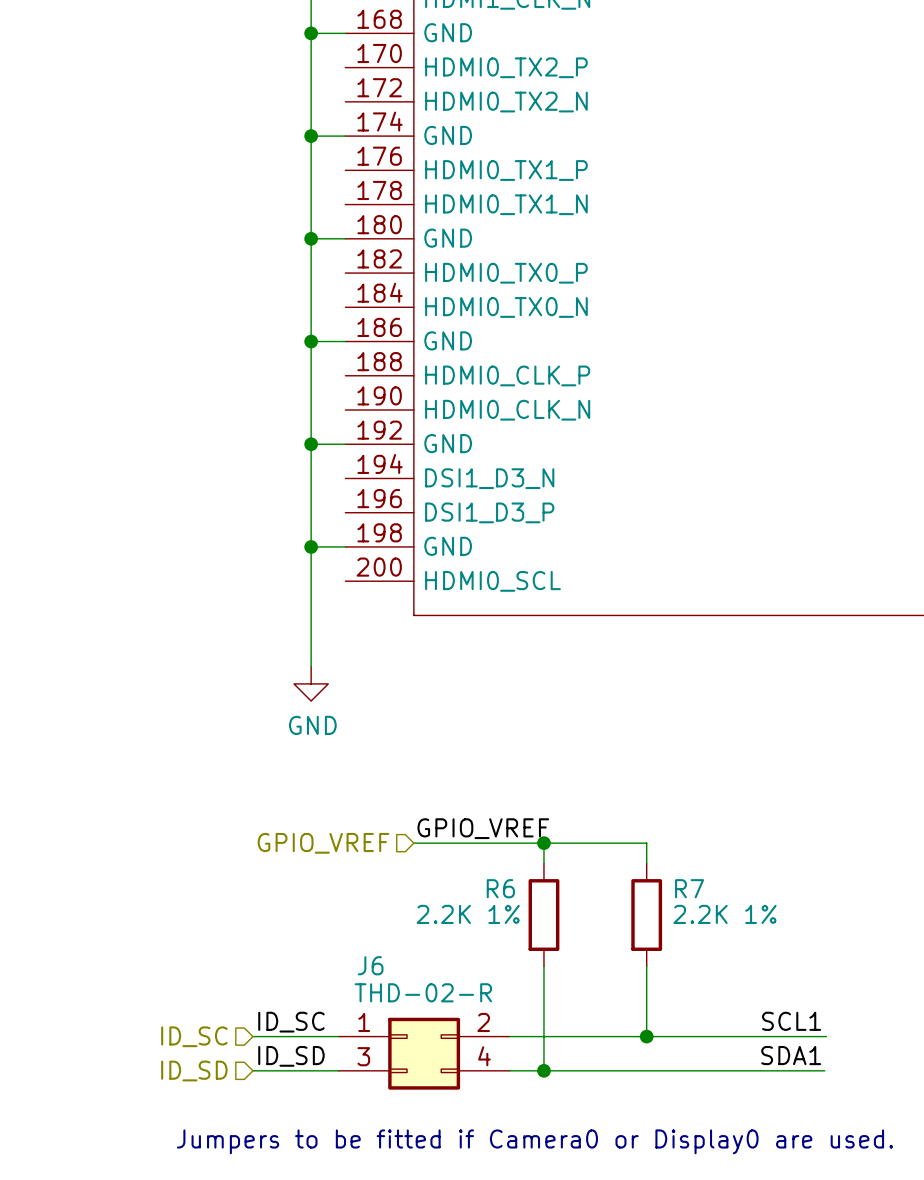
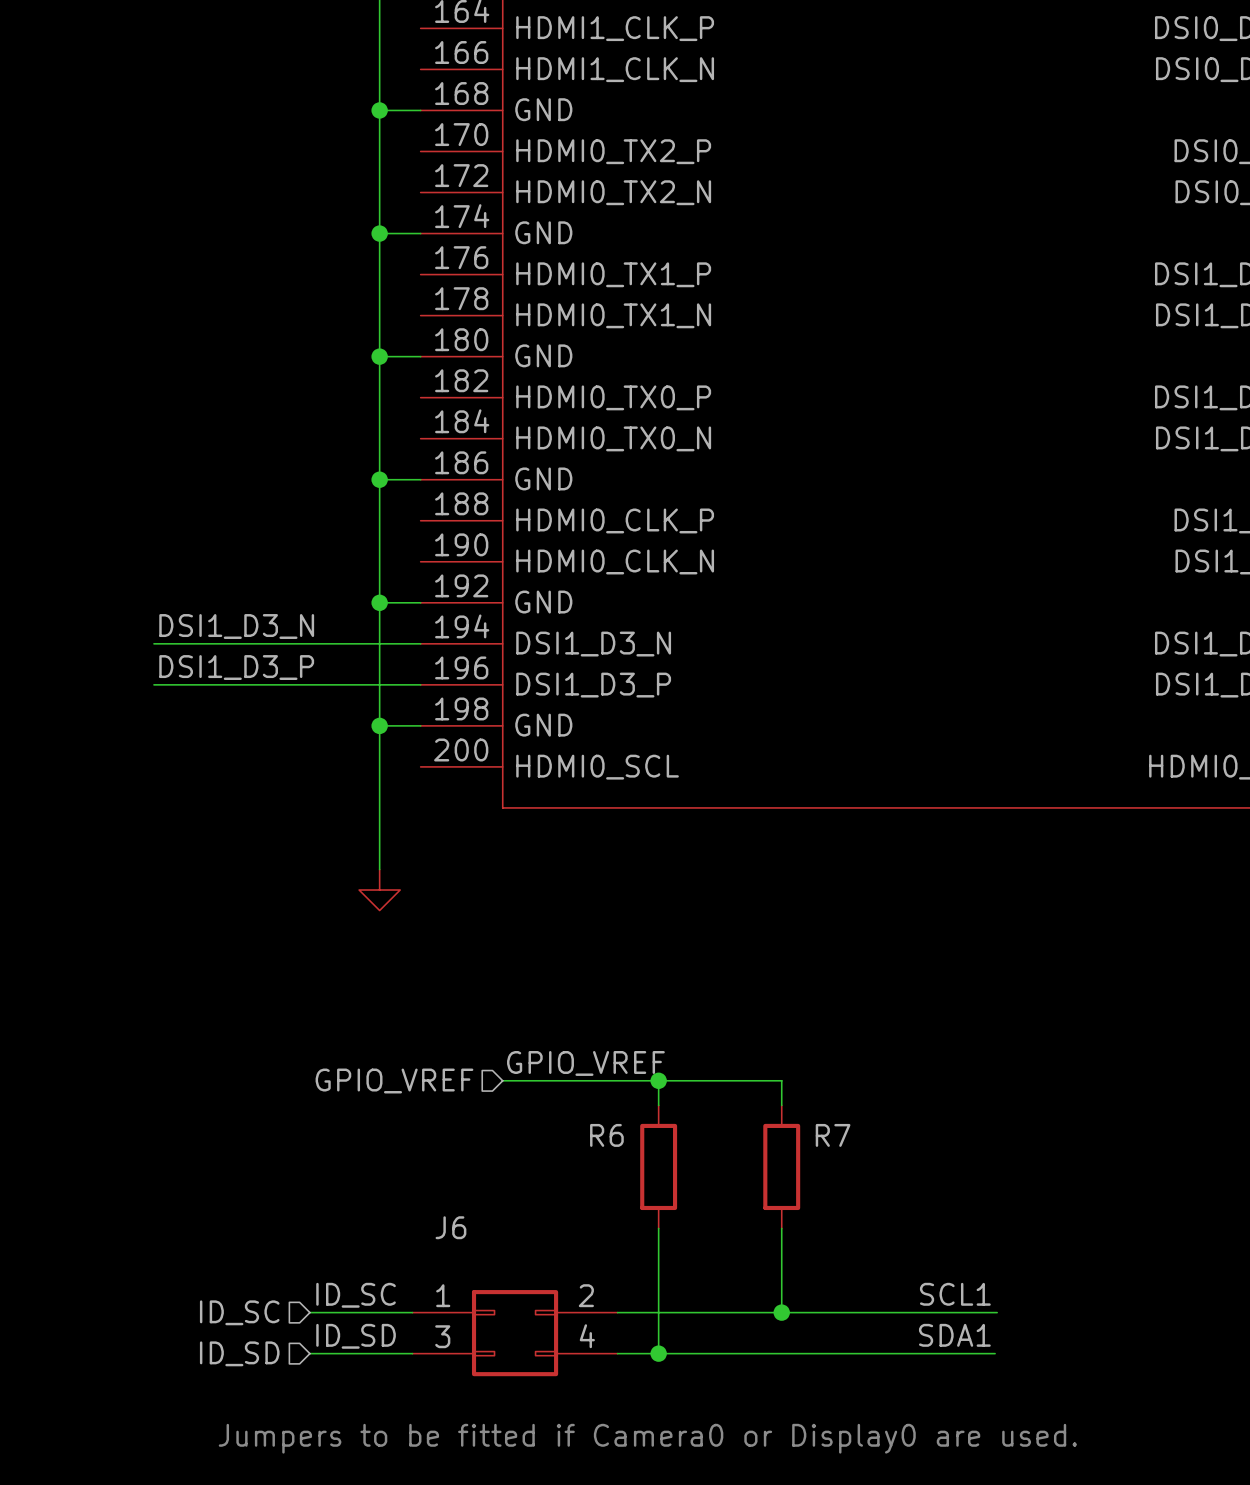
label: none -> DSI1_D3_N (236, 626)
wire: none -> (153, 643) (420, 643)
label: none -> DSI1_D3_P (236, 667)
wire: none -> (153, 684) (420, 684)
power symbol text: GND (312, 725) -> none
R6 value: 2.2K 1% (468, 914) -> none
R7 value: 2.2K 1% (725, 914) -> none
J6 value: THD-02-R (423, 992) -> none

